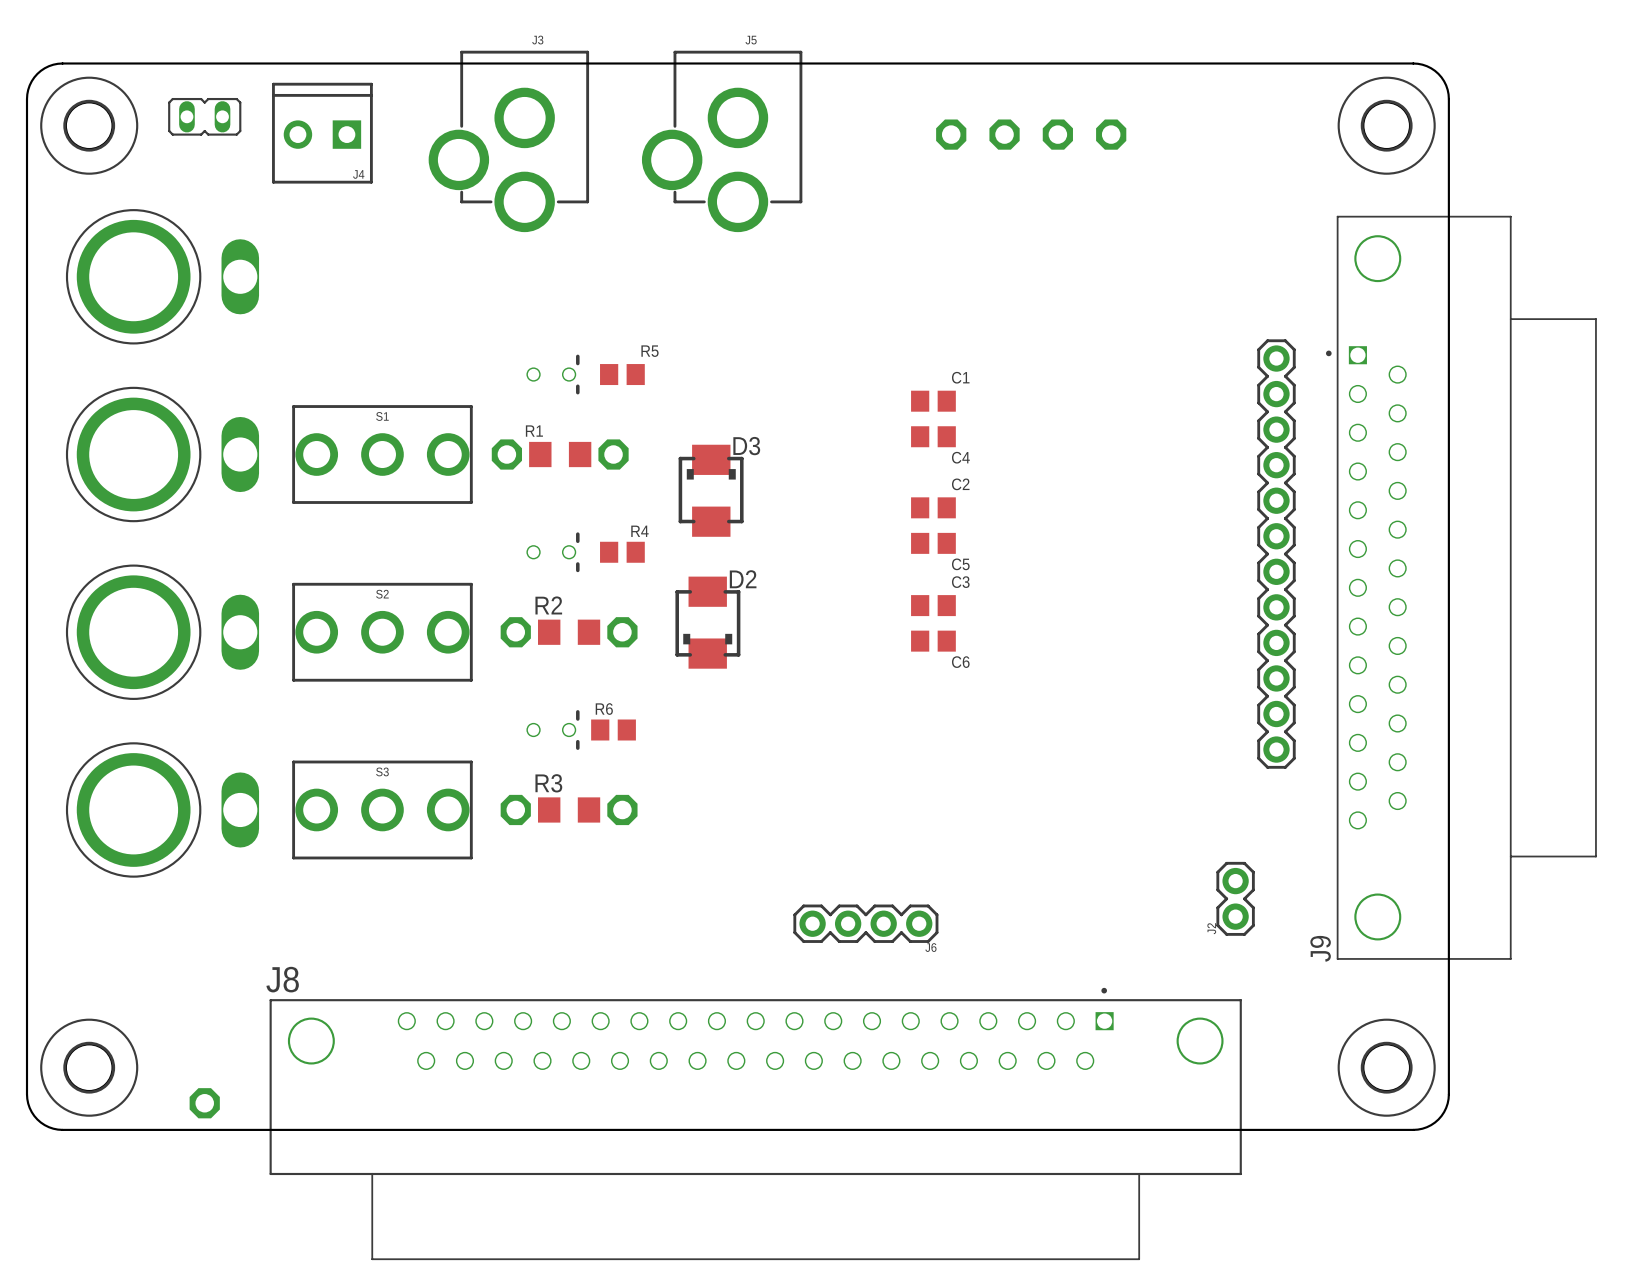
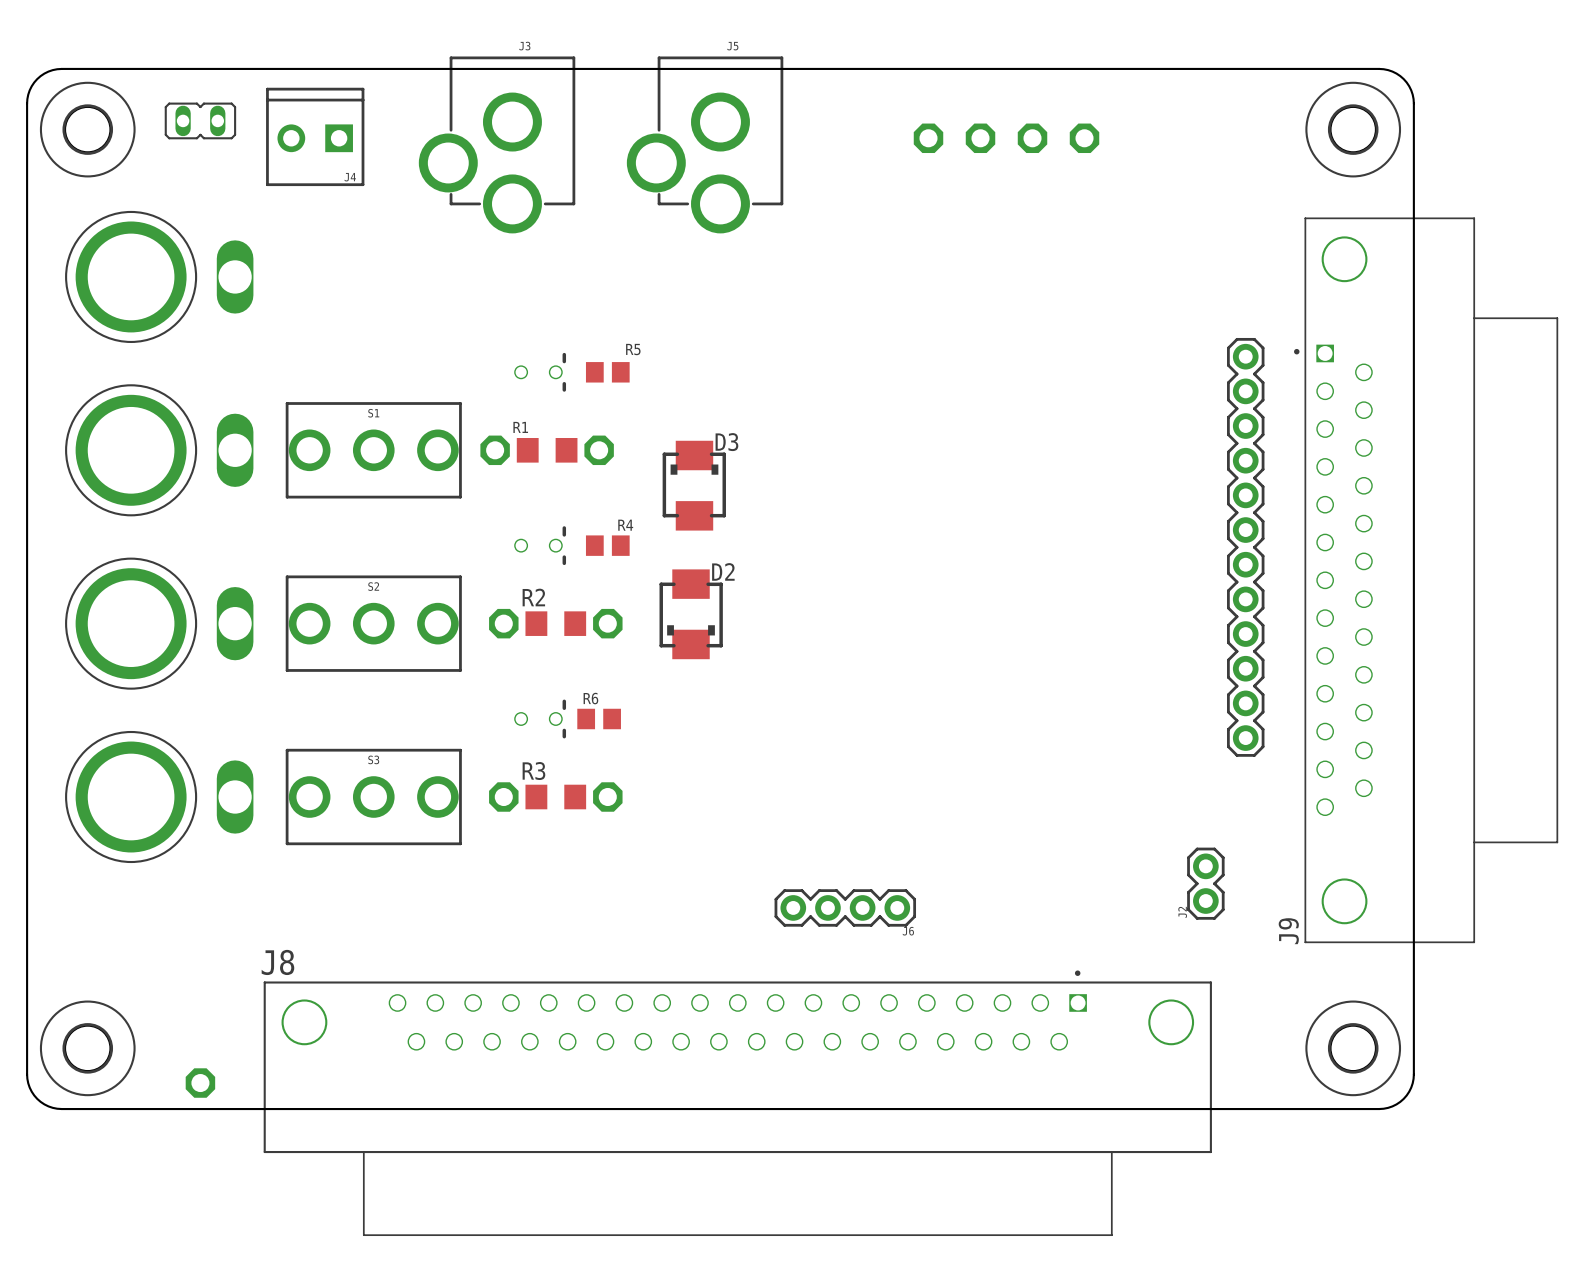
C1: (933, 401) -> none
C4: (933, 436) -> none
C2: (933, 507) -> none
C5: (933, 543) -> none
C3: (933, 605) -> none
C6: (933, 641) -> none

